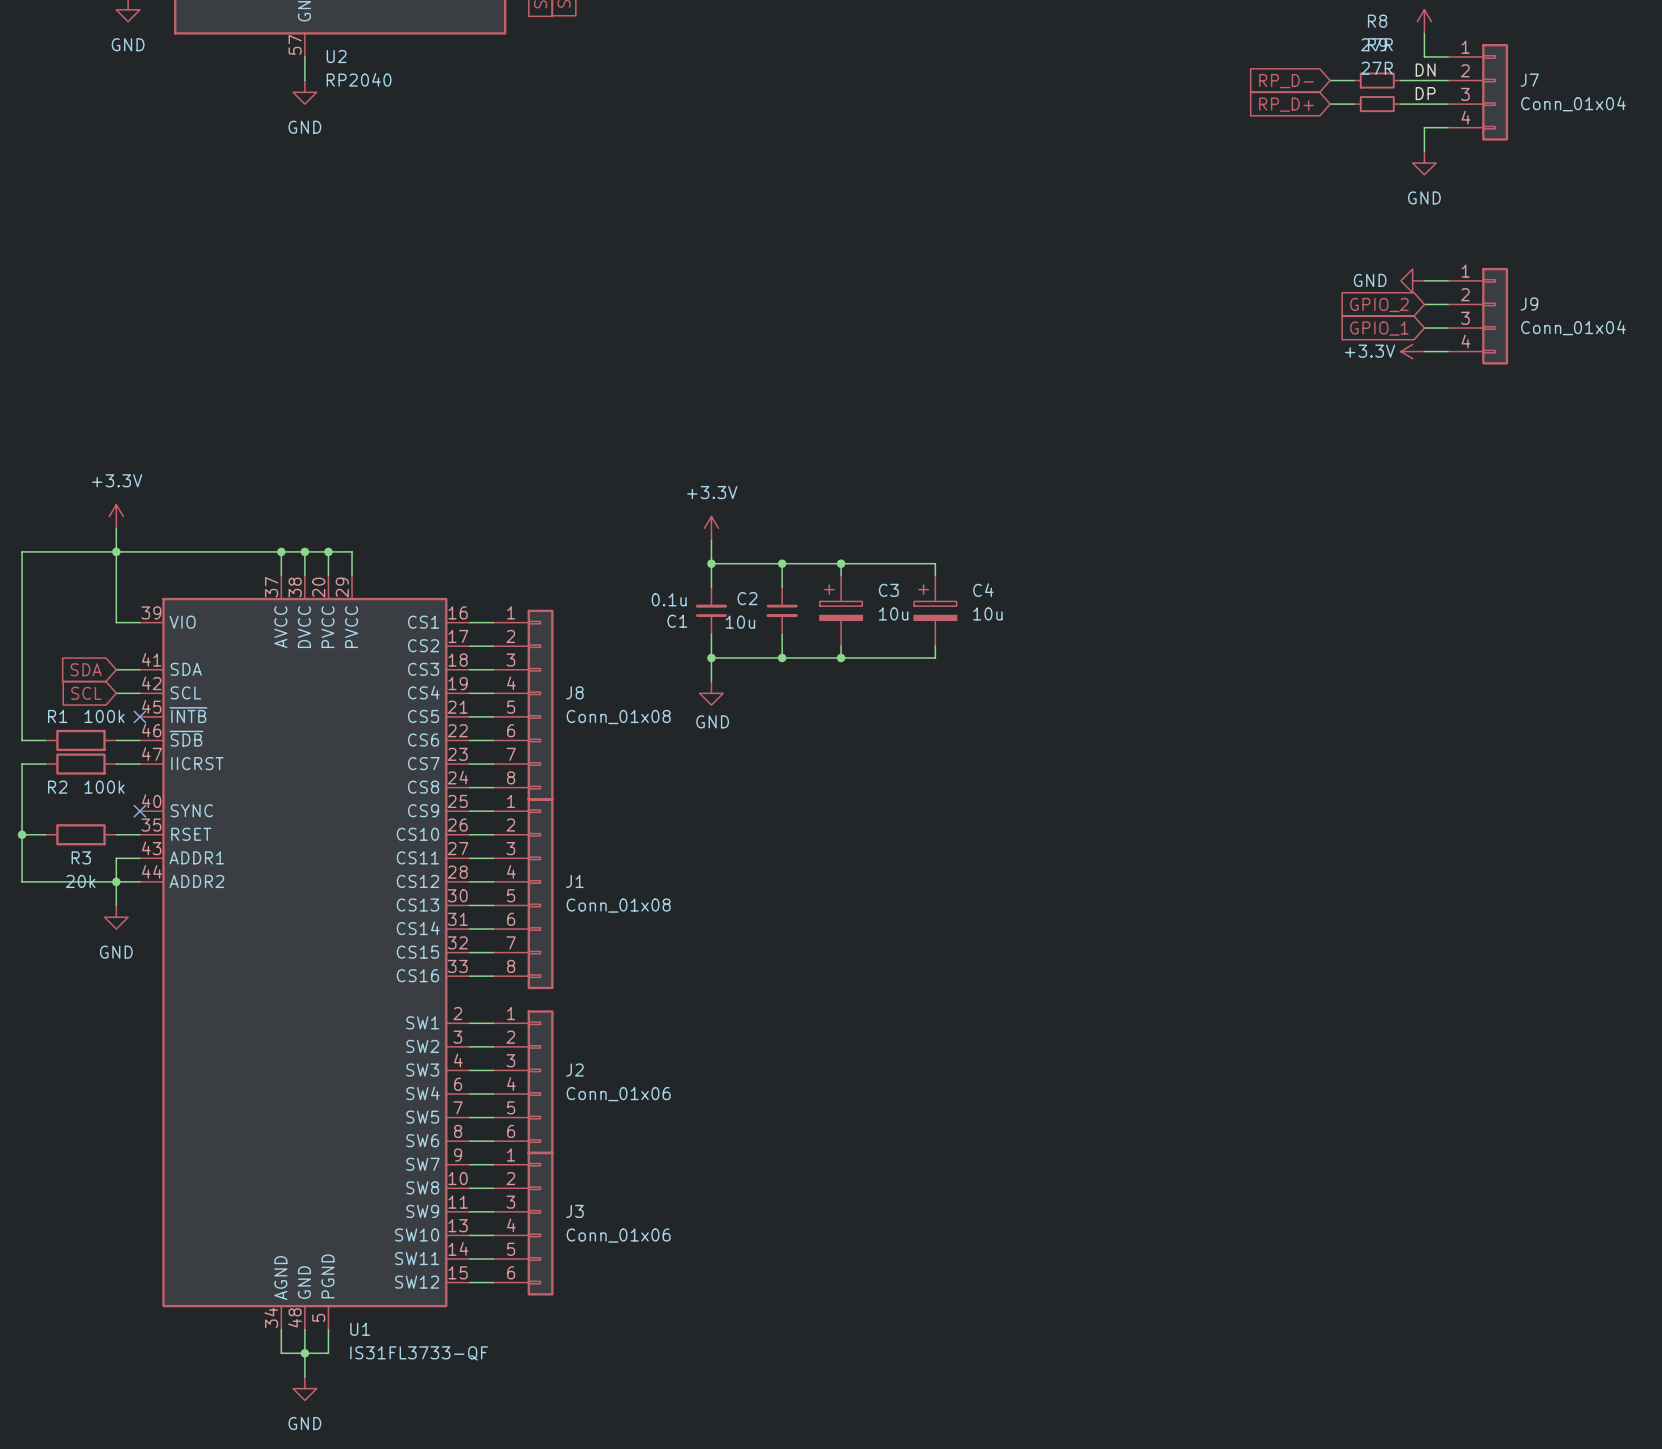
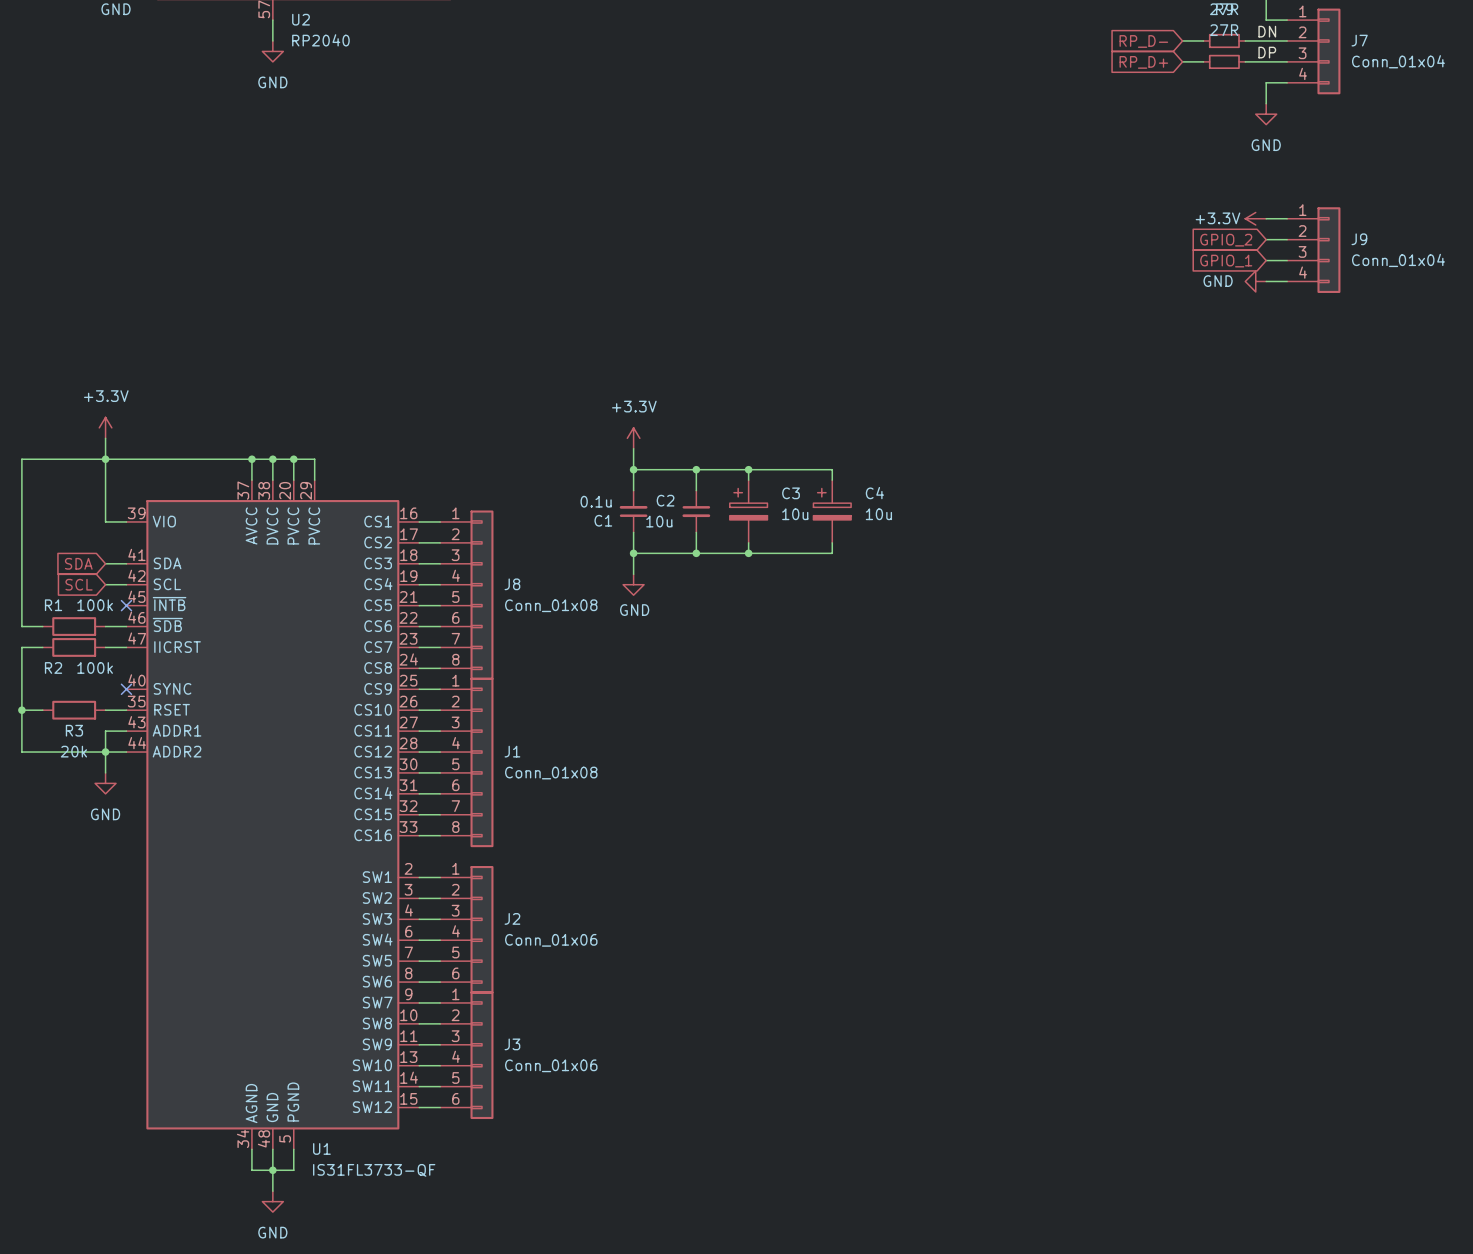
power symbol: GND (1412, 280) -> +3.3V (1255, 218)
power symbol: +3.3V (1412, 351) -> GND (1255, 281)

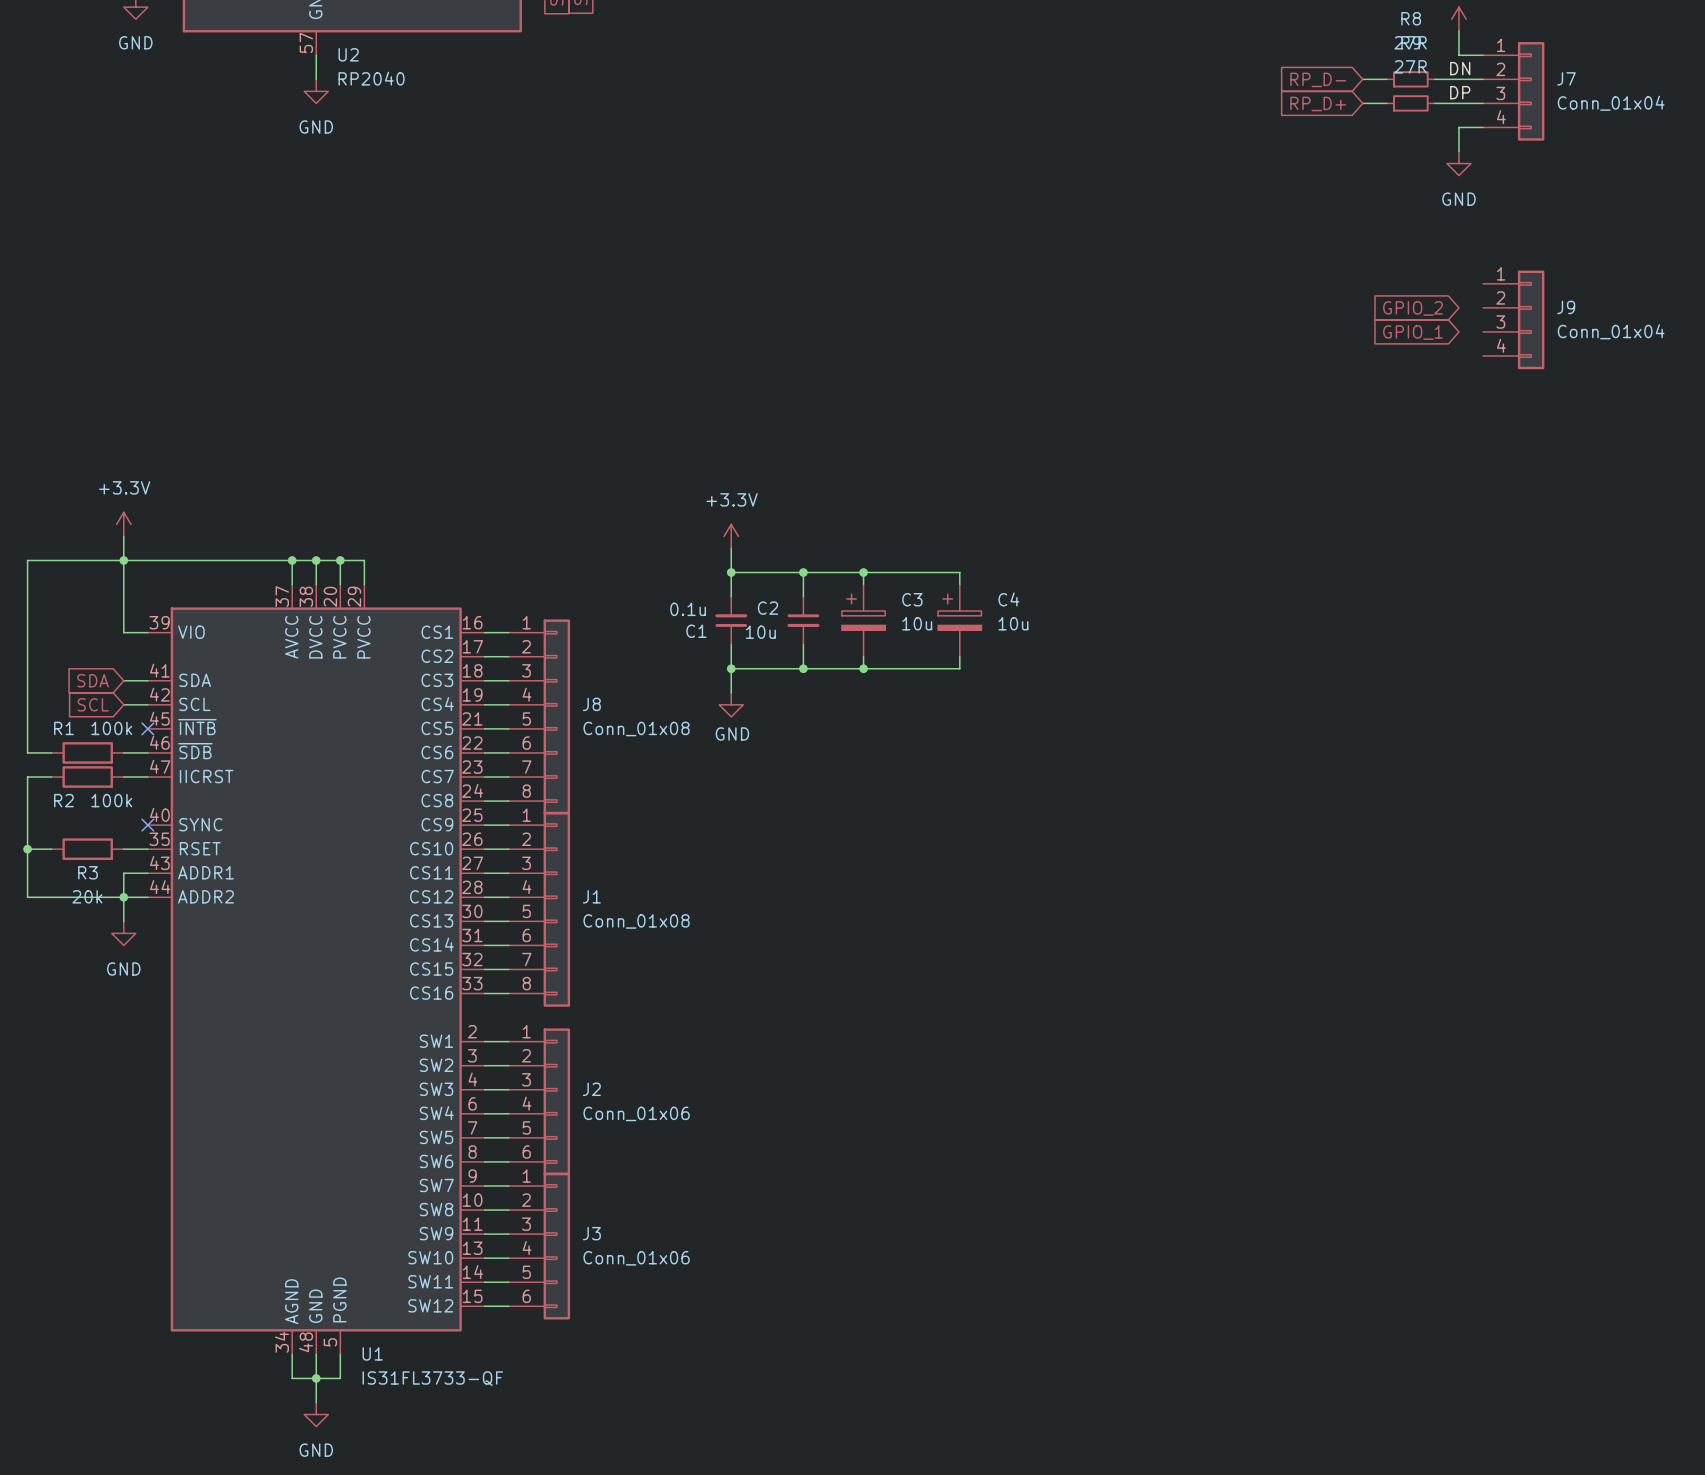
power symbol: +3.3V (1255, 218) -> none
wire: (1266, 218) (1287, 218) -> none
wire: (1266, 239) (1287, 239) -> none
wire: (1266, 260) (1287, 260) -> none
power symbol: GND (1255, 281) -> none
wire: (1266, 281) (1287, 281) -> none

